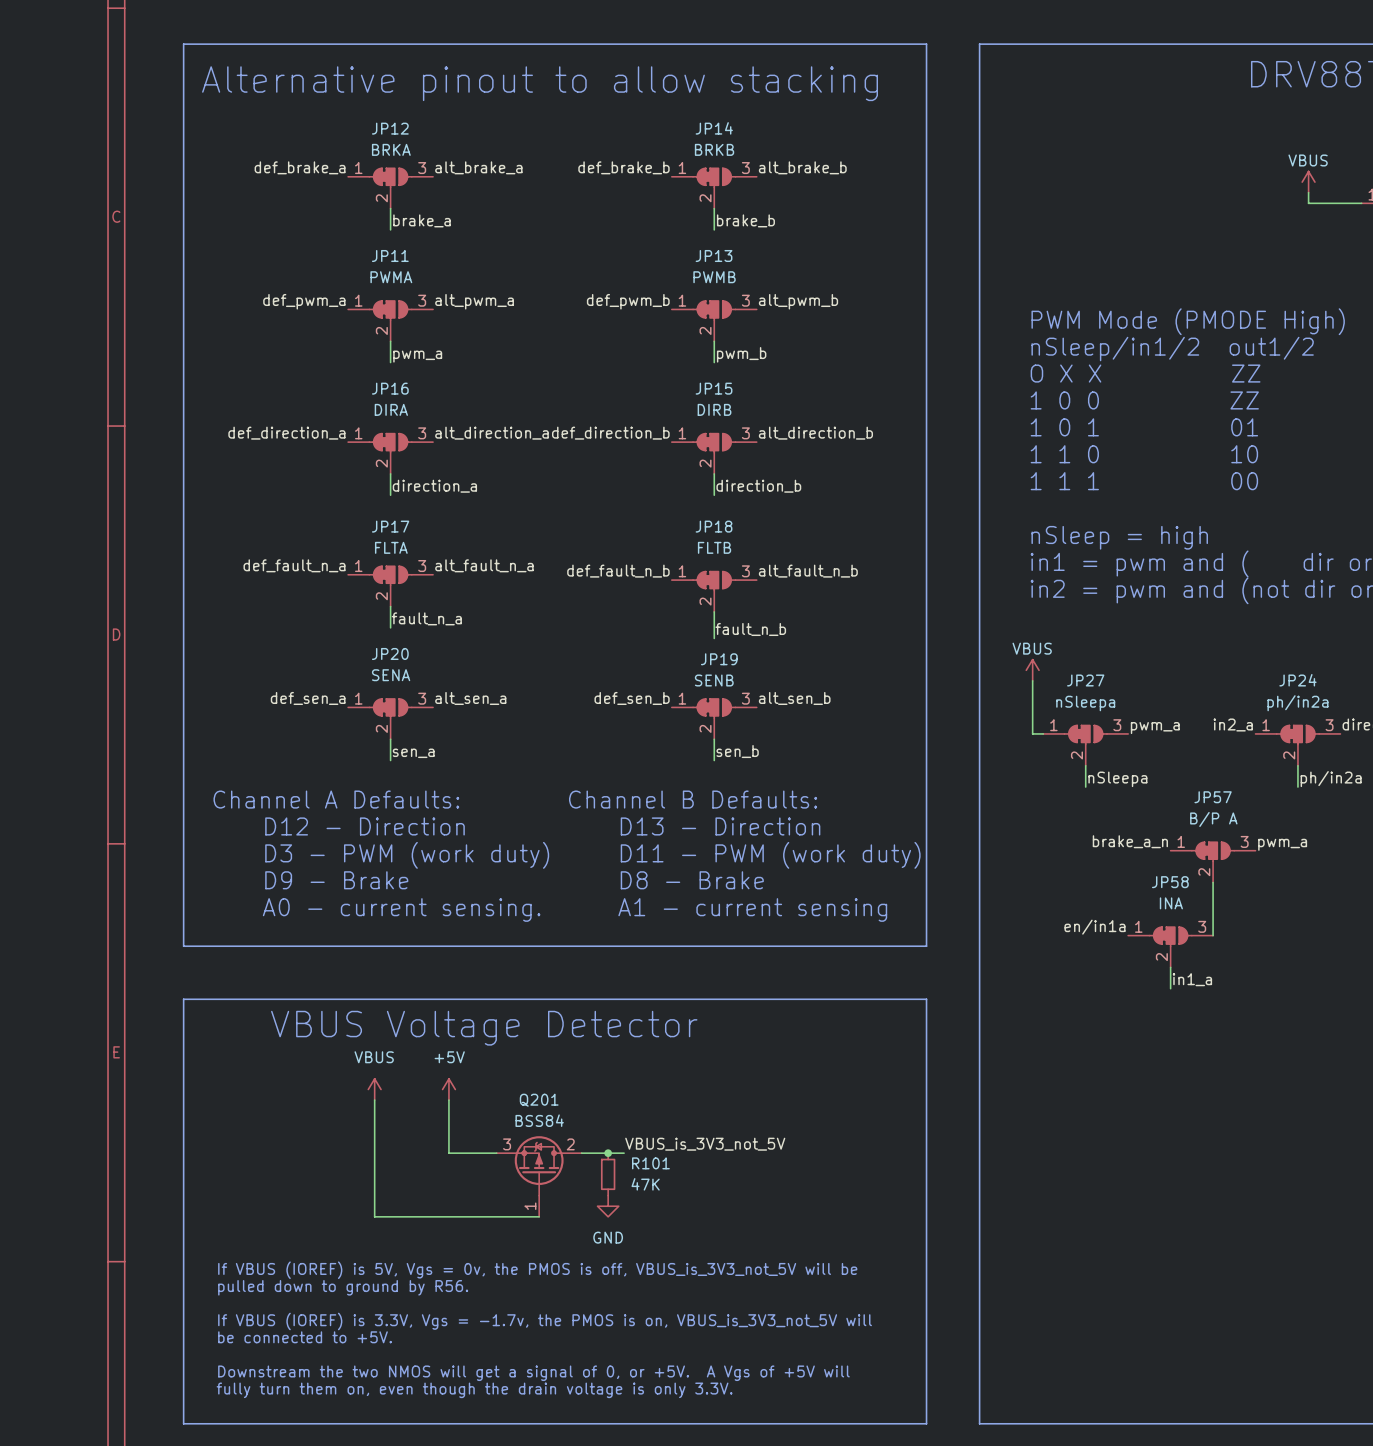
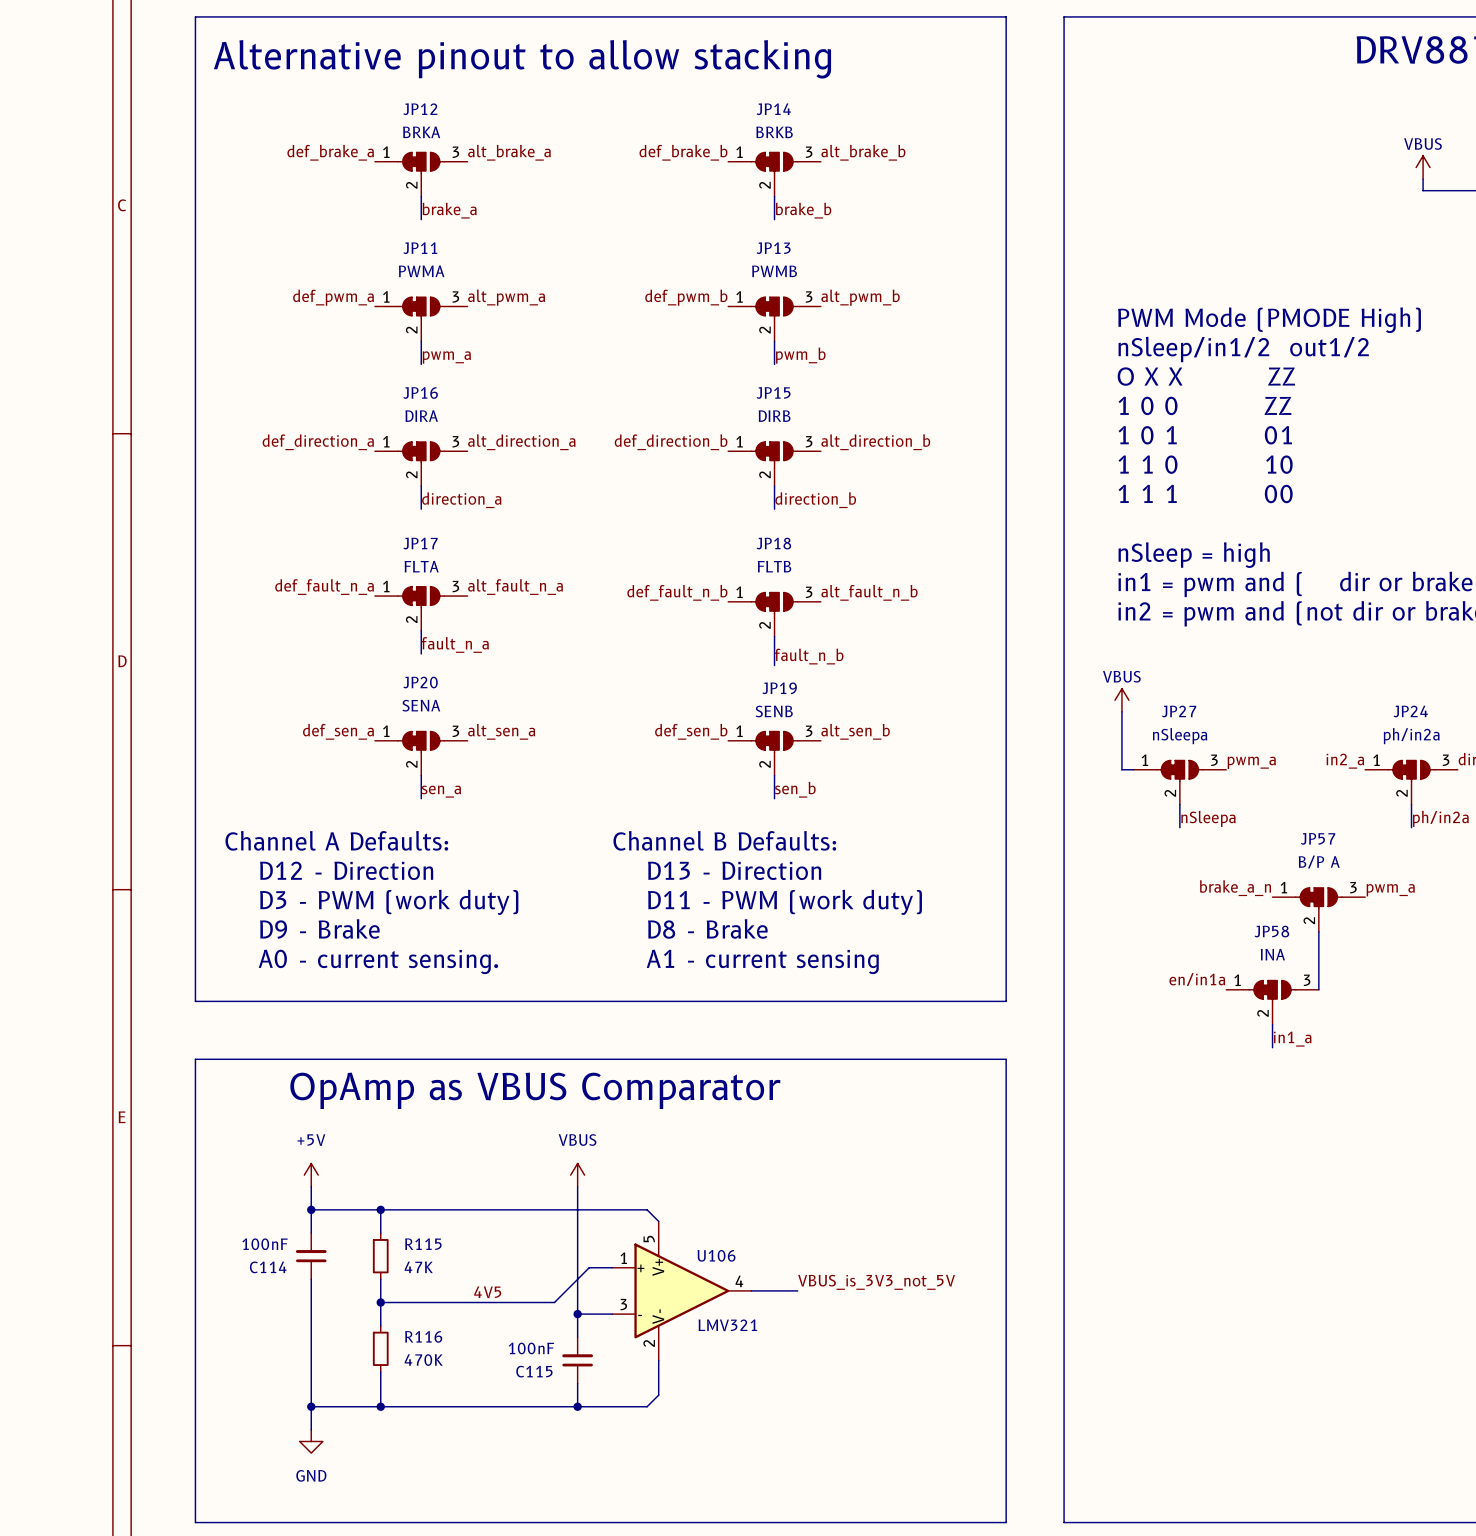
text: VBUS Voltage Detector (484, 1028) -> OpAmp as VBUS Comparator (535, 1090)
power symbol position: VBUS (374, 1089) -> VBUS (577, 1175)
power symbol position: +5V (448, 1089) -> +5V (311, 1175)
wire: (374, 1100) (374, 1216) (539, 1216) -> none
wire: (448, 1100) (448, 1153) (496, 1153) -> none
wire: none -> (311, 1186) (311, 1233)
wire: none -> (577, 1186) (577, 1337)
wire: none -> (311, 1209) (647, 1209) (658, 1221)
junction: none -> (311, 1209)
wire: none -> (380, 1209) (380, 1233)
junction: none -> (380, 1209)
label position: VBUS_is_3V3_not_5V (705, 1144) -> VBUS_is_3V3_not_5V (876, 1282)
wire: (581, 1153) (624, 1153) -> (751, 1290) (797, 1290)
junction: (608, 1153) -> none
R101: 47K (608, 1174) -> none
Q201: BSS84 (539, 1176) -> none
C114: none -> 100nF (311, 1256)
R115: none -> 47K (380, 1256)
wire: none -> (612, 1267) (589, 1267) (554, 1302) (380, 1302)
wire: none -> (311, 1279) (311, 1429)
wire: none -> (380, 1279) (380, 1325)
power symbol: GND (608, 1206) -> none
U106: none -> LMV321 (681, 1290)
label: none -> 4V5 (487, 1292)
junction: none -> (380, 1302)
wire: none -> (577, 1314) (612, 1314)
junction: none -> (577, 1314)
R116: none -> 470K (380, 1348)
text: If VBUS (IOREF) is 5V, Vgs = 0v, the PMOS is off, VBUS_is_3V3_not_5V will be (537, 1270) -> none
C115: none -> 100nF (577, 1360)
wire: none -> (658, 1360) (658, 1395) (647, 1406) (311, 1406)
wire: none -> (380, 1372) (380, 1406)
text: pulled down to ground by R56. (343, 1287) -> none
wire: none -> (577, 1383) (577, 1406)
junction: none -> (311, 1406)
junction: none -> (380, 1406)
junction: none -> (577, 1406)
text: If VBUS (IOREF) is 3.3V, Vgs = -1.7v, the PMOS is on, VBUS_is_3V3_not_5V will (545, 1321) -> none
text: be connected to +5V. (305, 1337) -> none
power symbol: none -> GND (311, 1441)
text: Downstream the two NMOS will get a signal of 0, or +5V. A Vgs of +5V will (533, 1373) -> none
text: fully turn them on, even though the drain voltage is only 3.3V. (474, 1390) -> none

